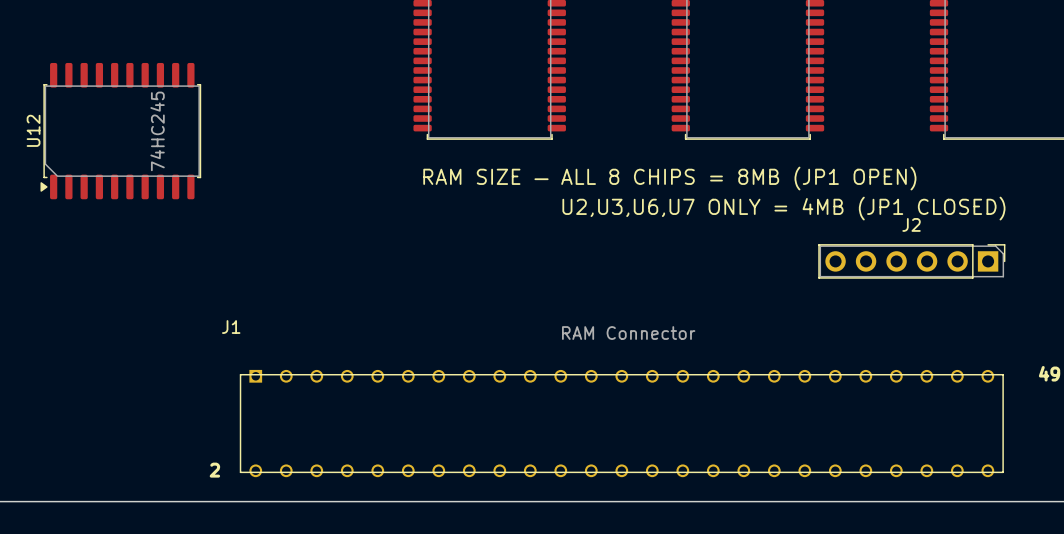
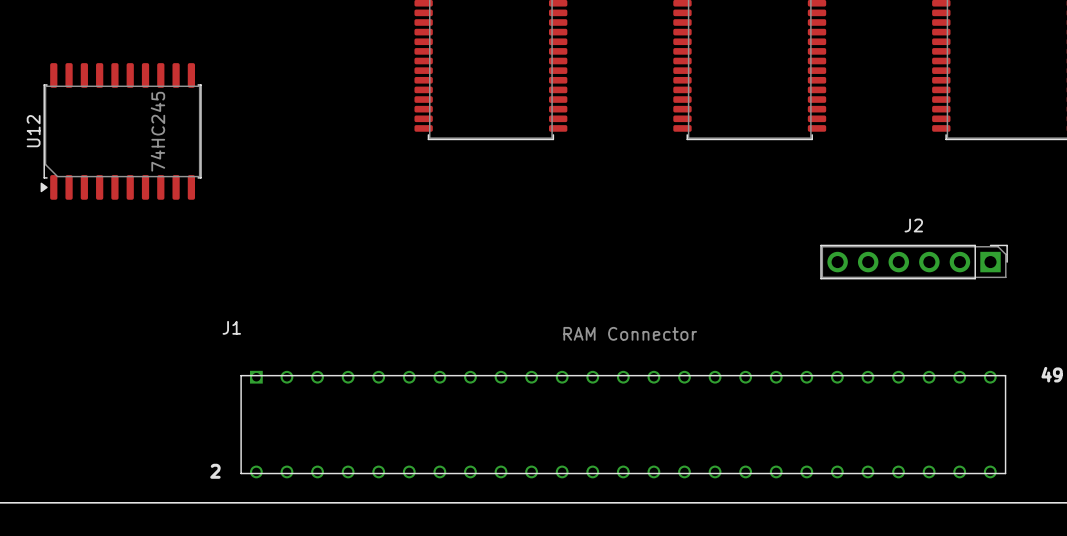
text: RAM SIZE — ALL 8 CHIPS = 8MB (JP1 OPEN) (669, 178) -> none
text: U2,U3,U6,U7 ONLY = 4MB (JP1 CLOSED) (783, 208) -> none

